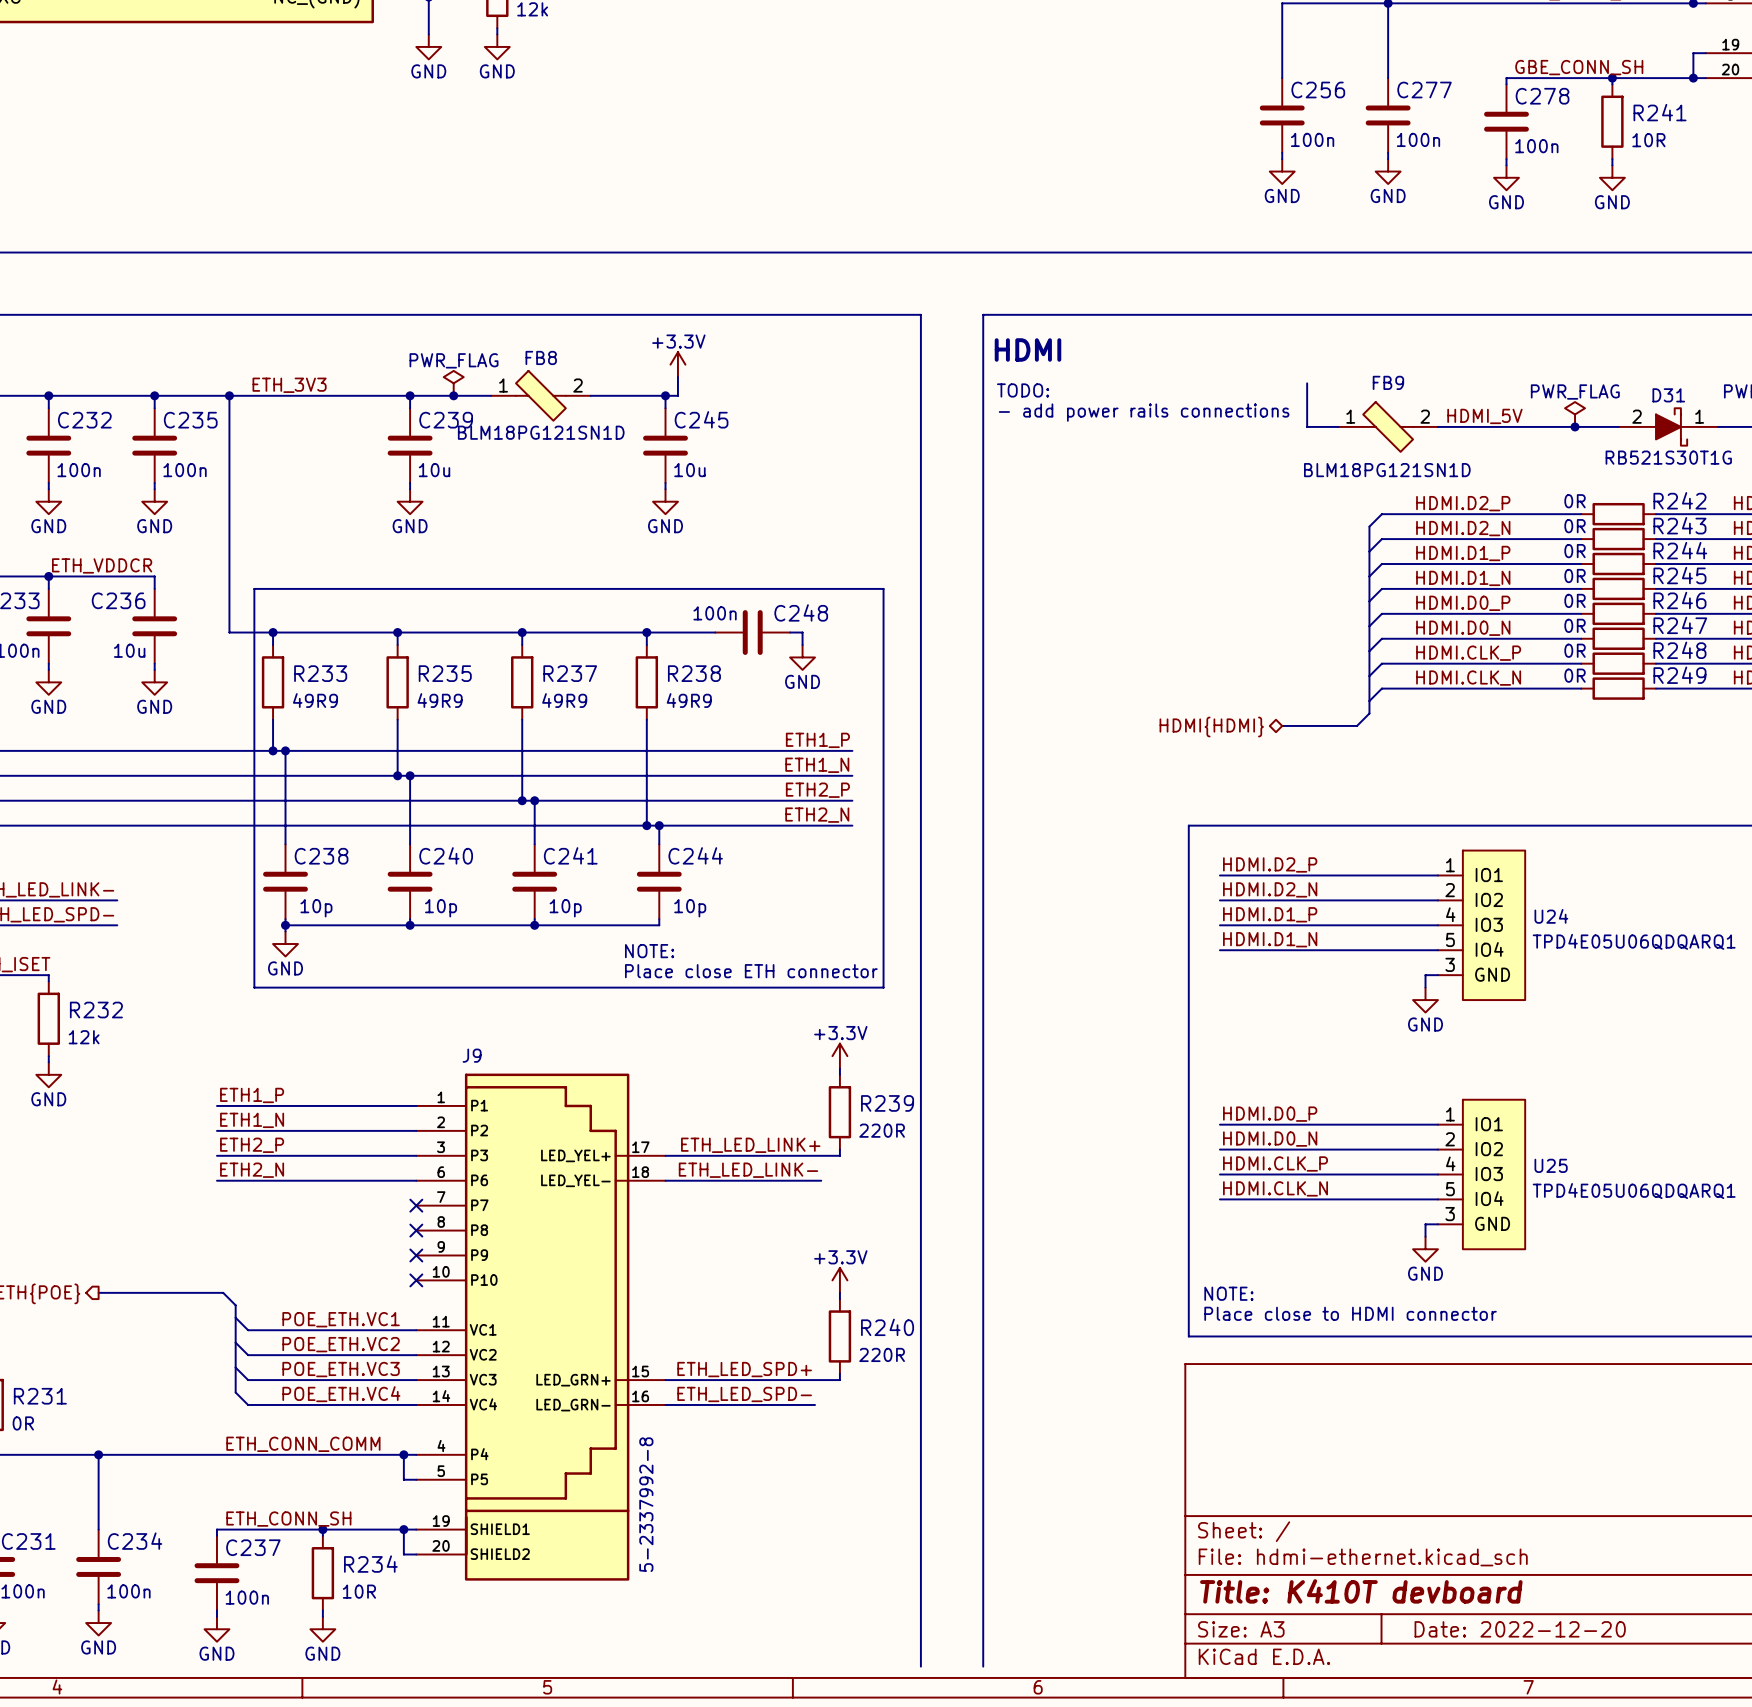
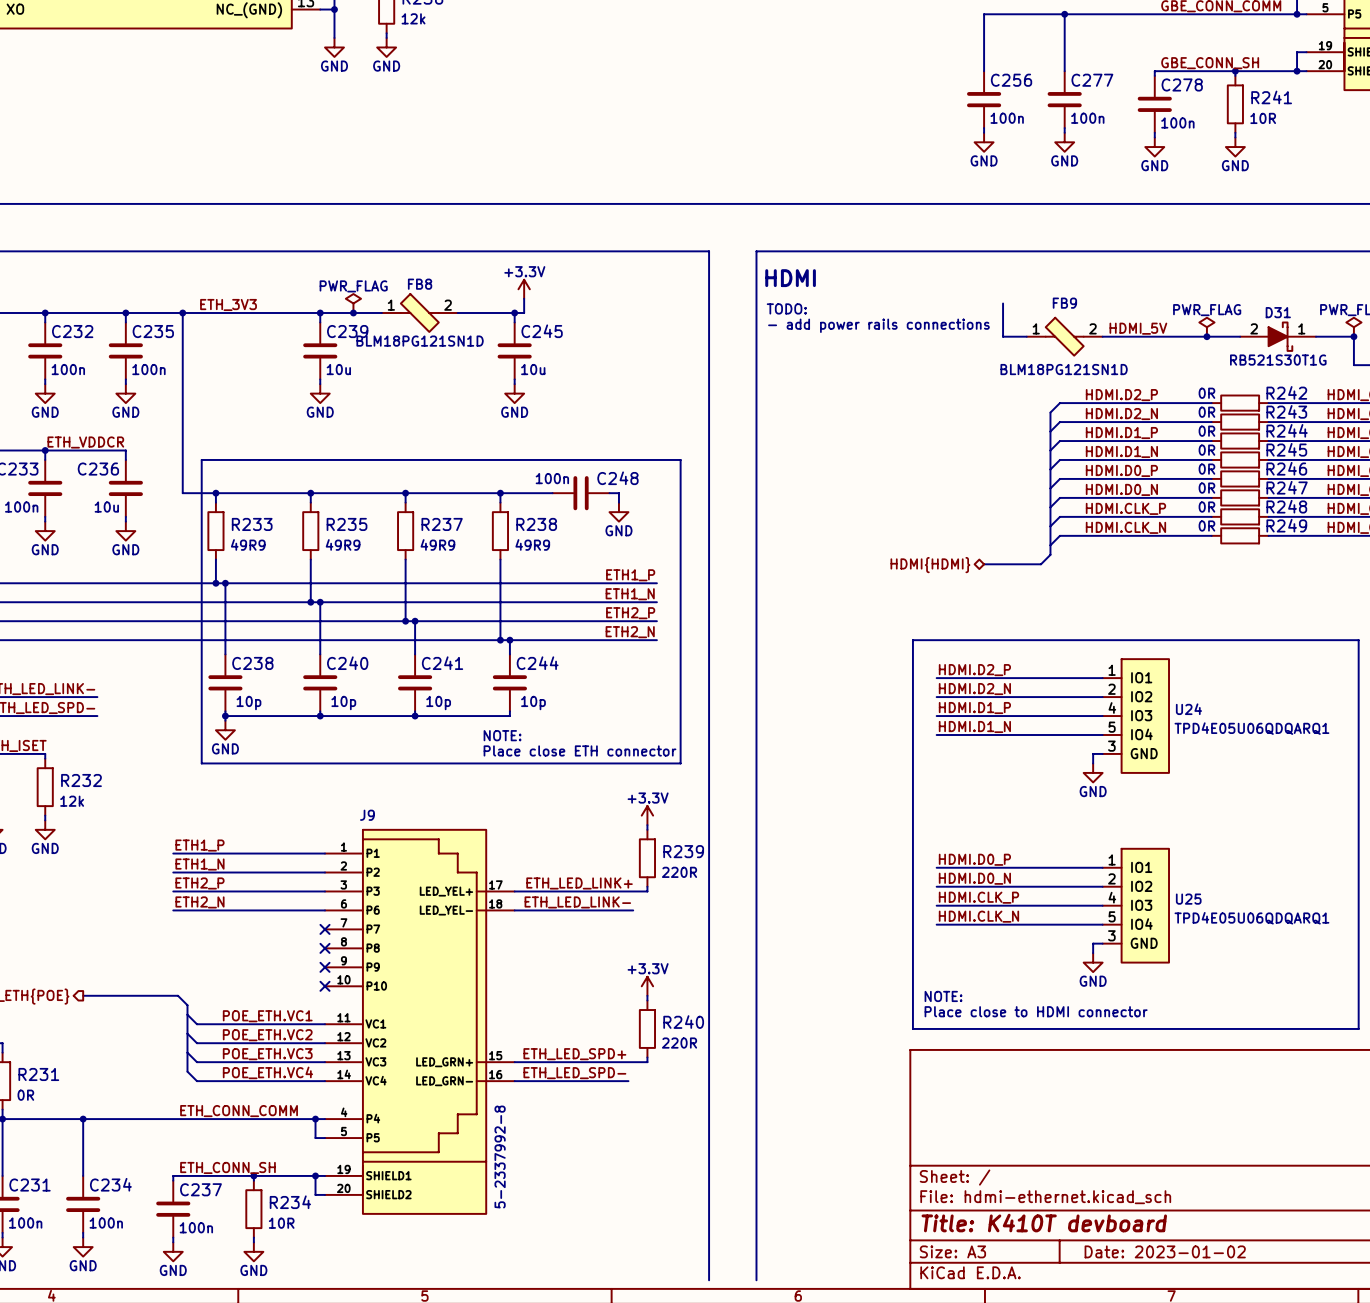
title block: Date: 2022-12-20 (1520, 1629) -> Date: 2023-01-02 (1165, 1251)

